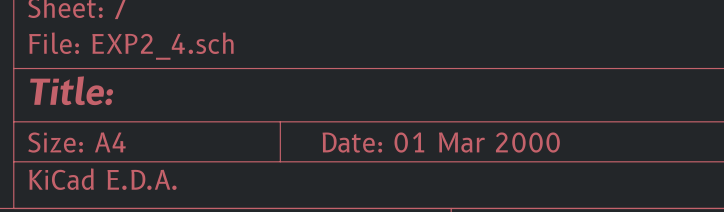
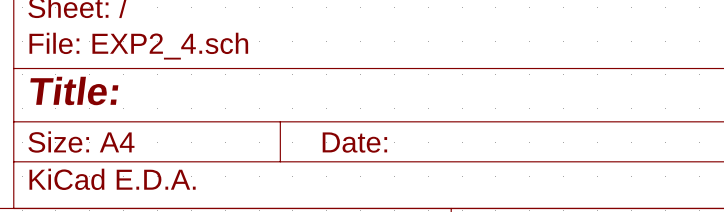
title block: Date: 01 Mar 2000 (441, 142) -> Date: (354, 142)

